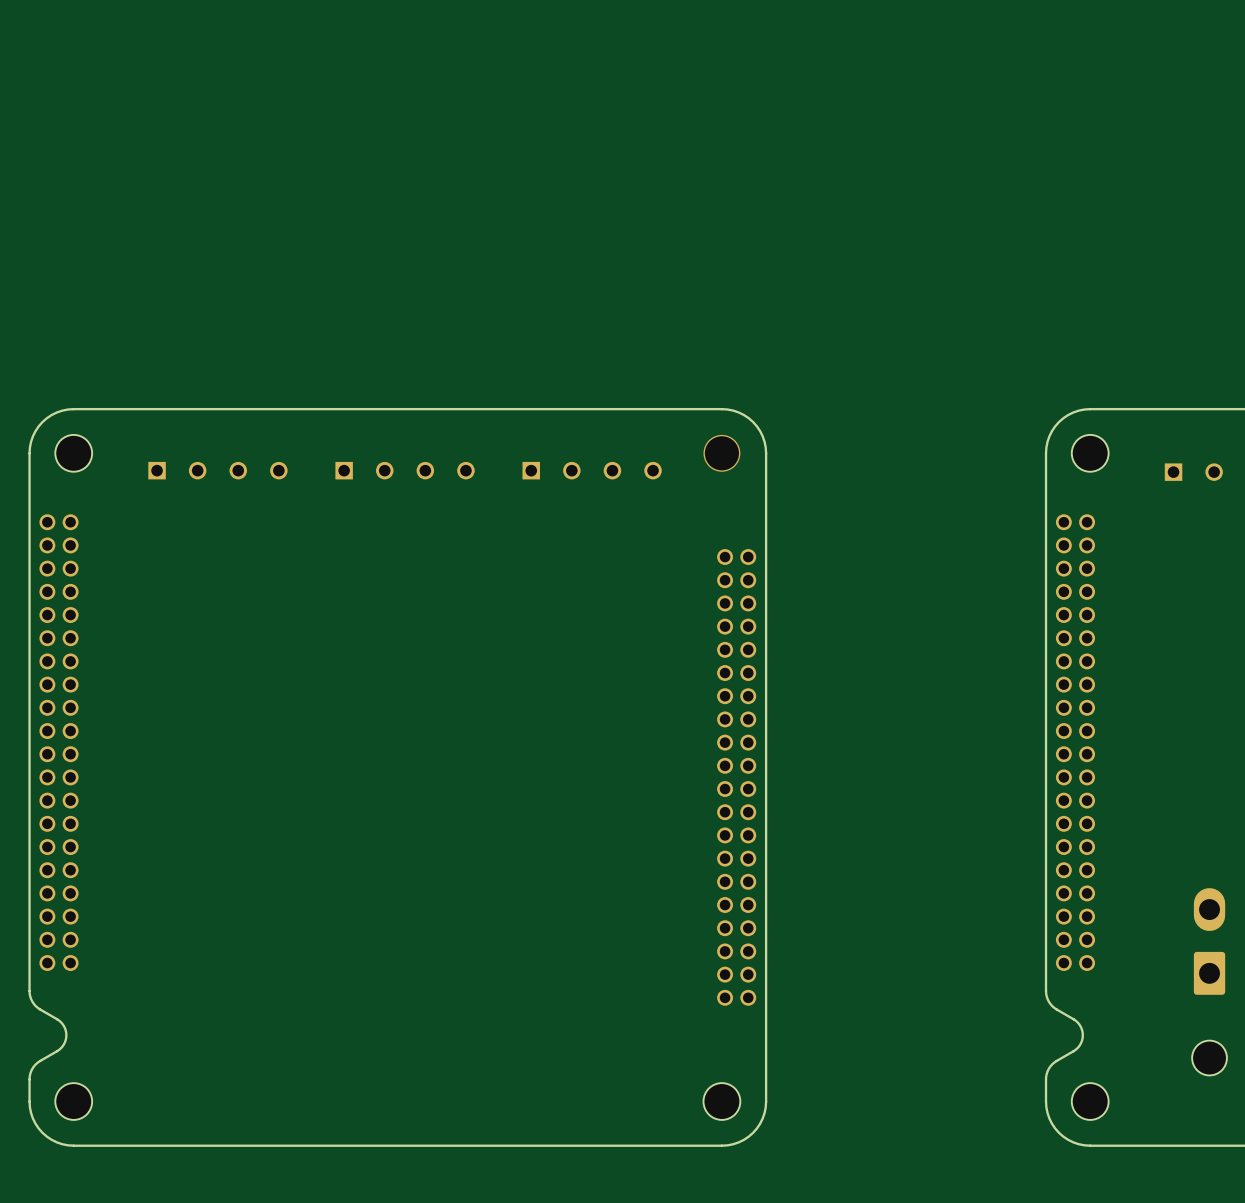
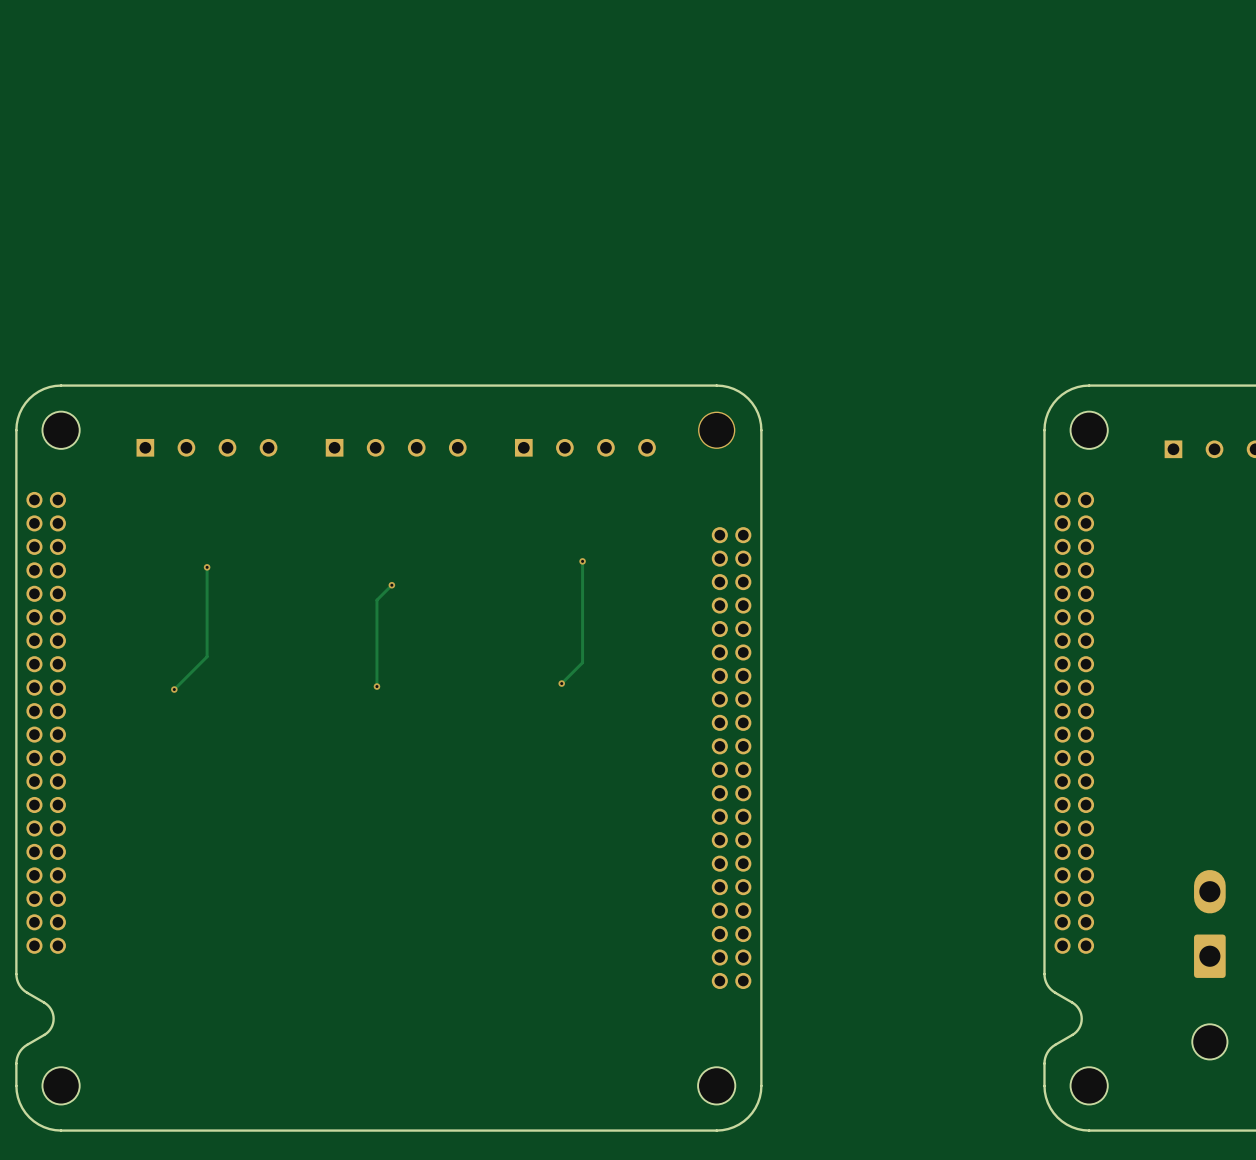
track: none -> (582, 561) (582, 662) (561, 683)
via: none -> (582, 561)
track: none -> (207, 567) (207, 656) (174, 689)
via: none -> (207, 567)
track: none -> (391, 585) (376, 600) (376, 686)
via: none -> (391, 585)
via: none -> (561, 683)
via: none -> (376, 686)
via: none -> (174, 689)

